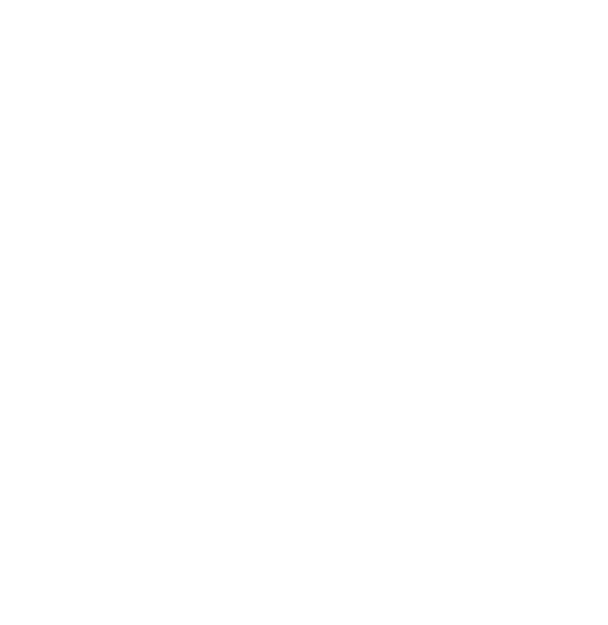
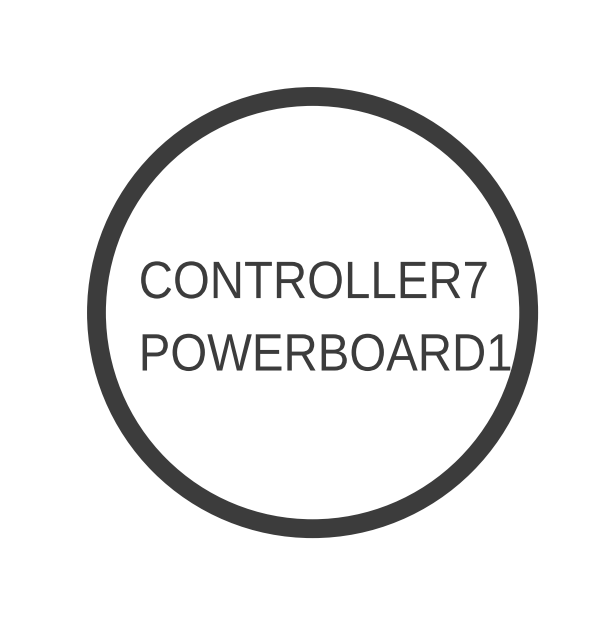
drawing: none -> [87, 87, 539, 539]
text: none -> CONTROLLER7 (313, 279)
text: none -> POWERBOARD1 (326, 352)

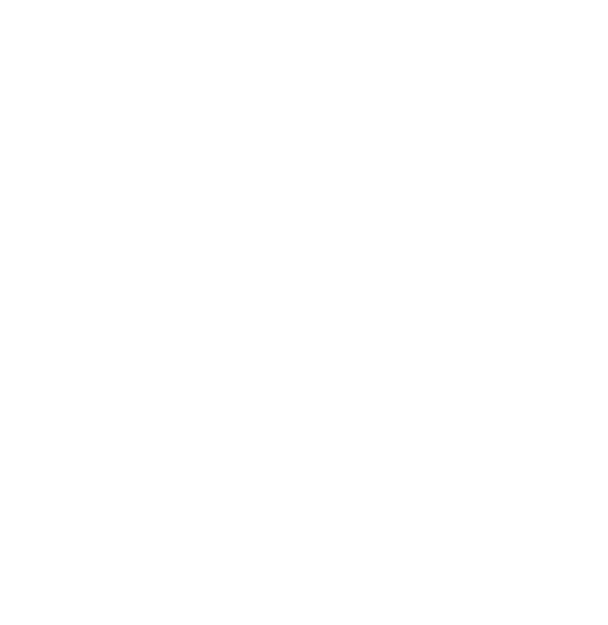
drawing: [87, 87, 539, 539] -> none
text: CONTROLLER7 (313, 279) -> none
text: POWERBOARD1 (326, 352) -> none

